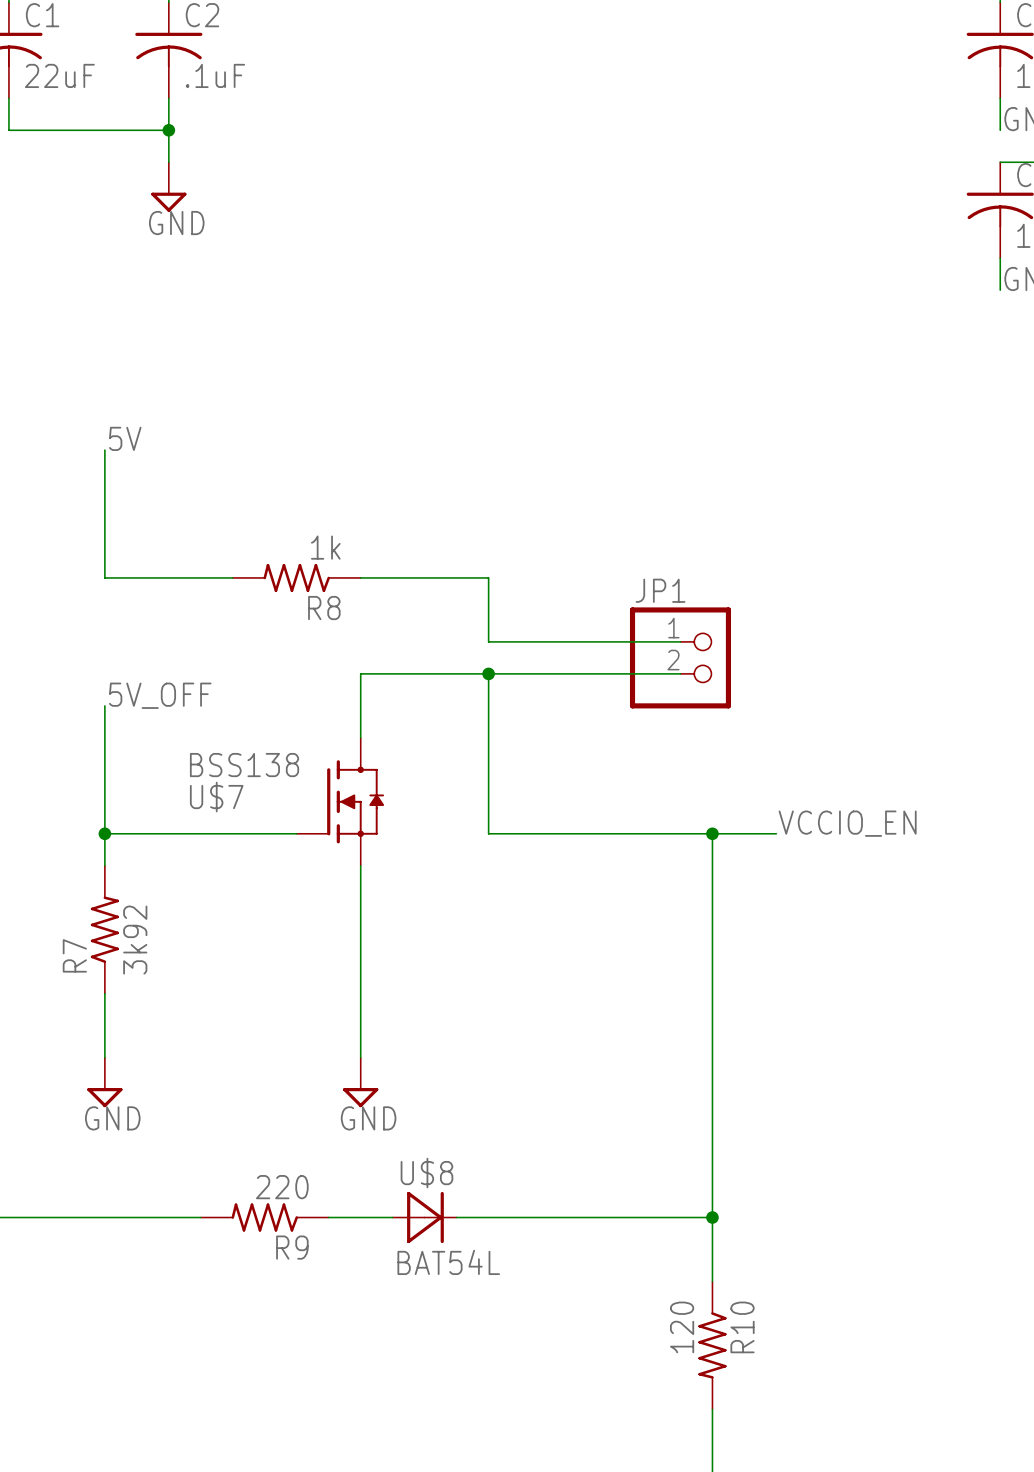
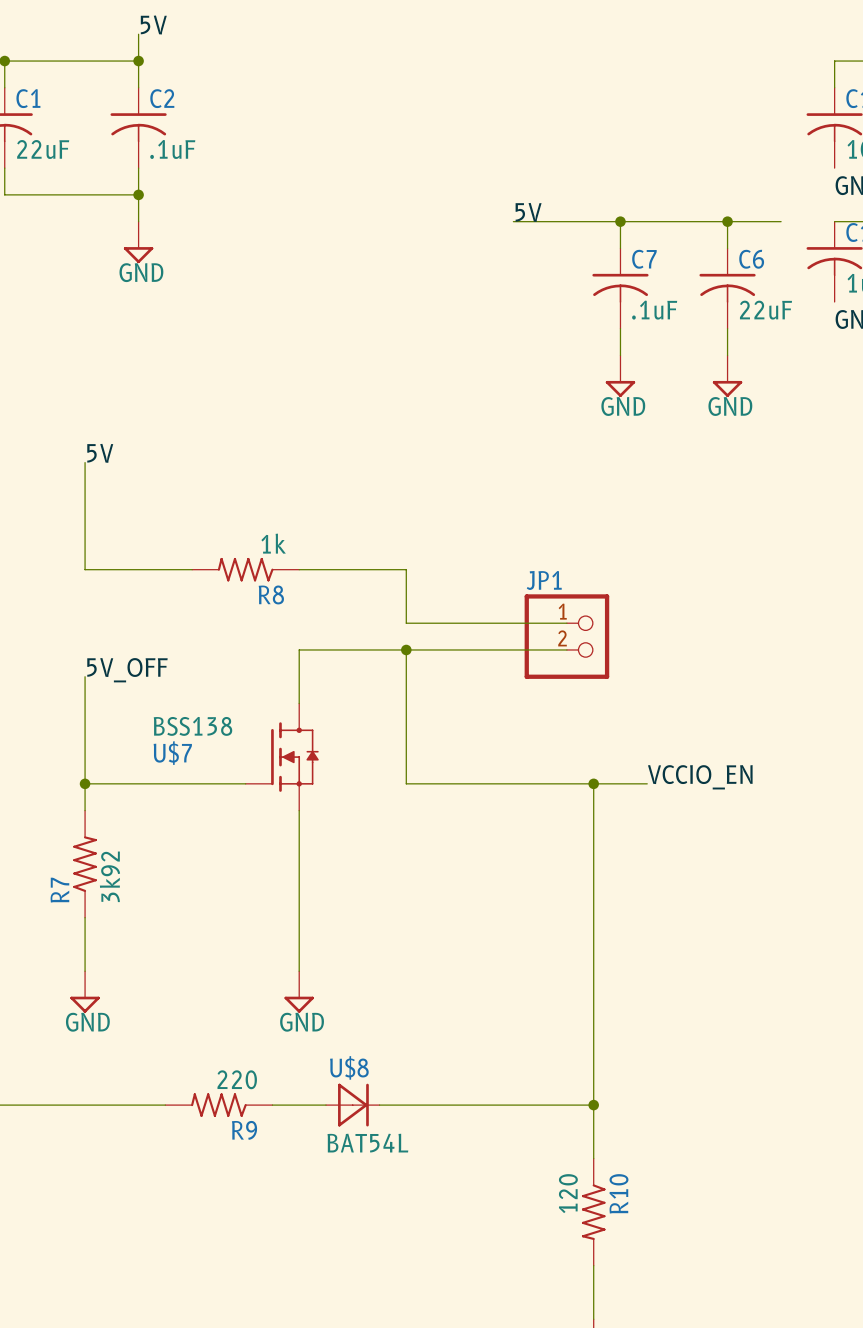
wire: (1000, 98) (1000, 130) -> (727, 221) (727, 248)
label: none -> 5V (528, 212)
wire: none -> (513, 221) (781, 221)
wire: none -> (620, 221) (620, 248)
junction: none -> (620, 221)
junction: none -> (727, 221)
C7: none -> .1uF (620, 288)
C6: none -> 22uF (727, 288)
wire: (1000, 258) (1000, 290) -> (727, 328) (727, 355)
wire: none -> (620, 328) (620, 355)
power symbol: none -> GND (620, 376)
power symbol: none -> GND (727, 376)

